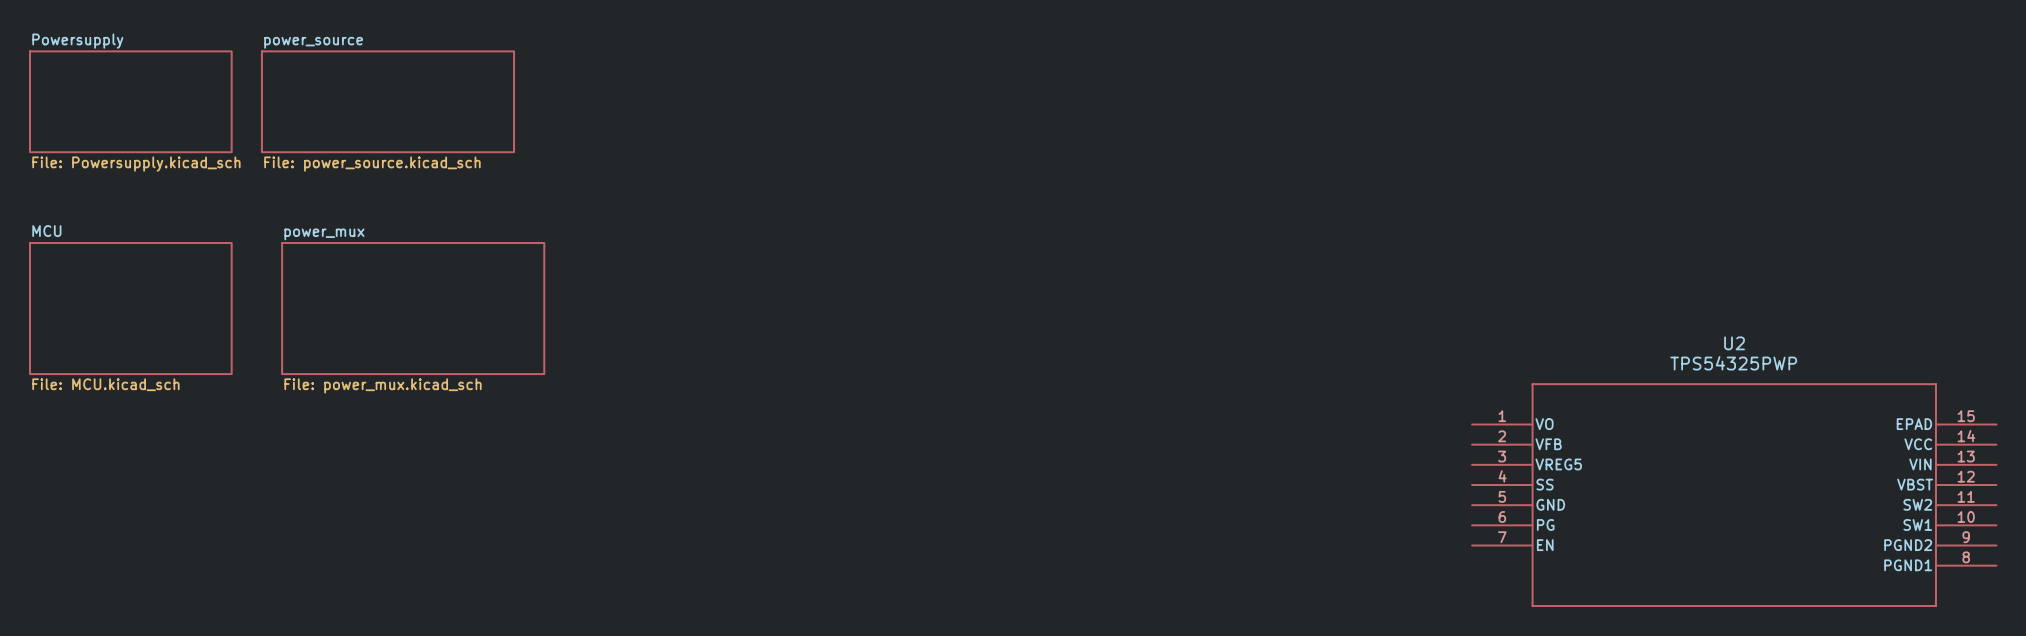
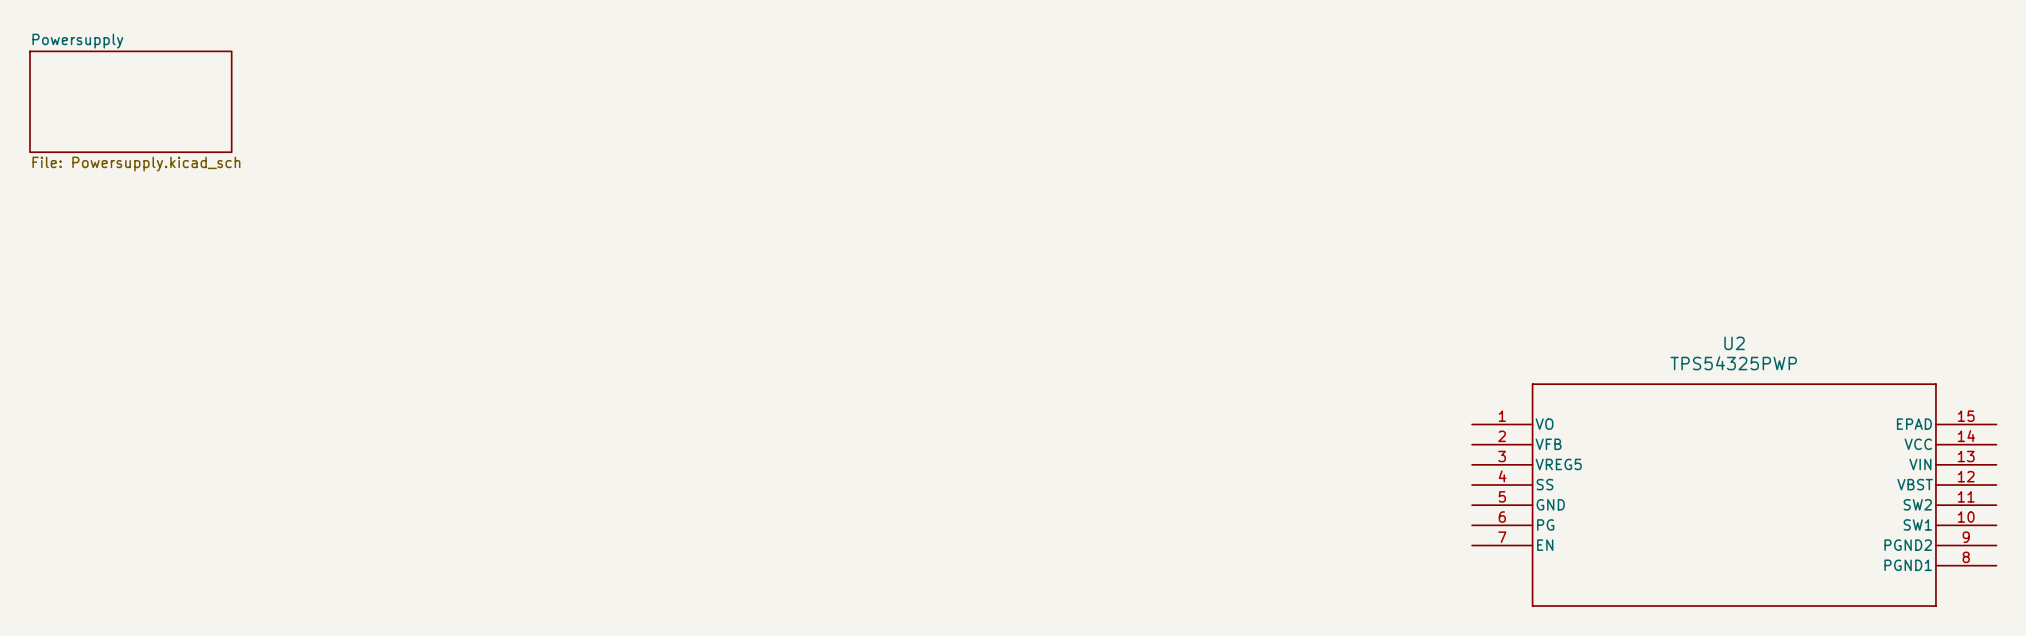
sheet power_source: File: power_source.kicad_sch (387, 101) -> none
sheet MCU: File: MCU.kicad_sch (130, 308) -> none
sheet power_mux: File: power_mux.kicad_sch (413, 308) -> none

